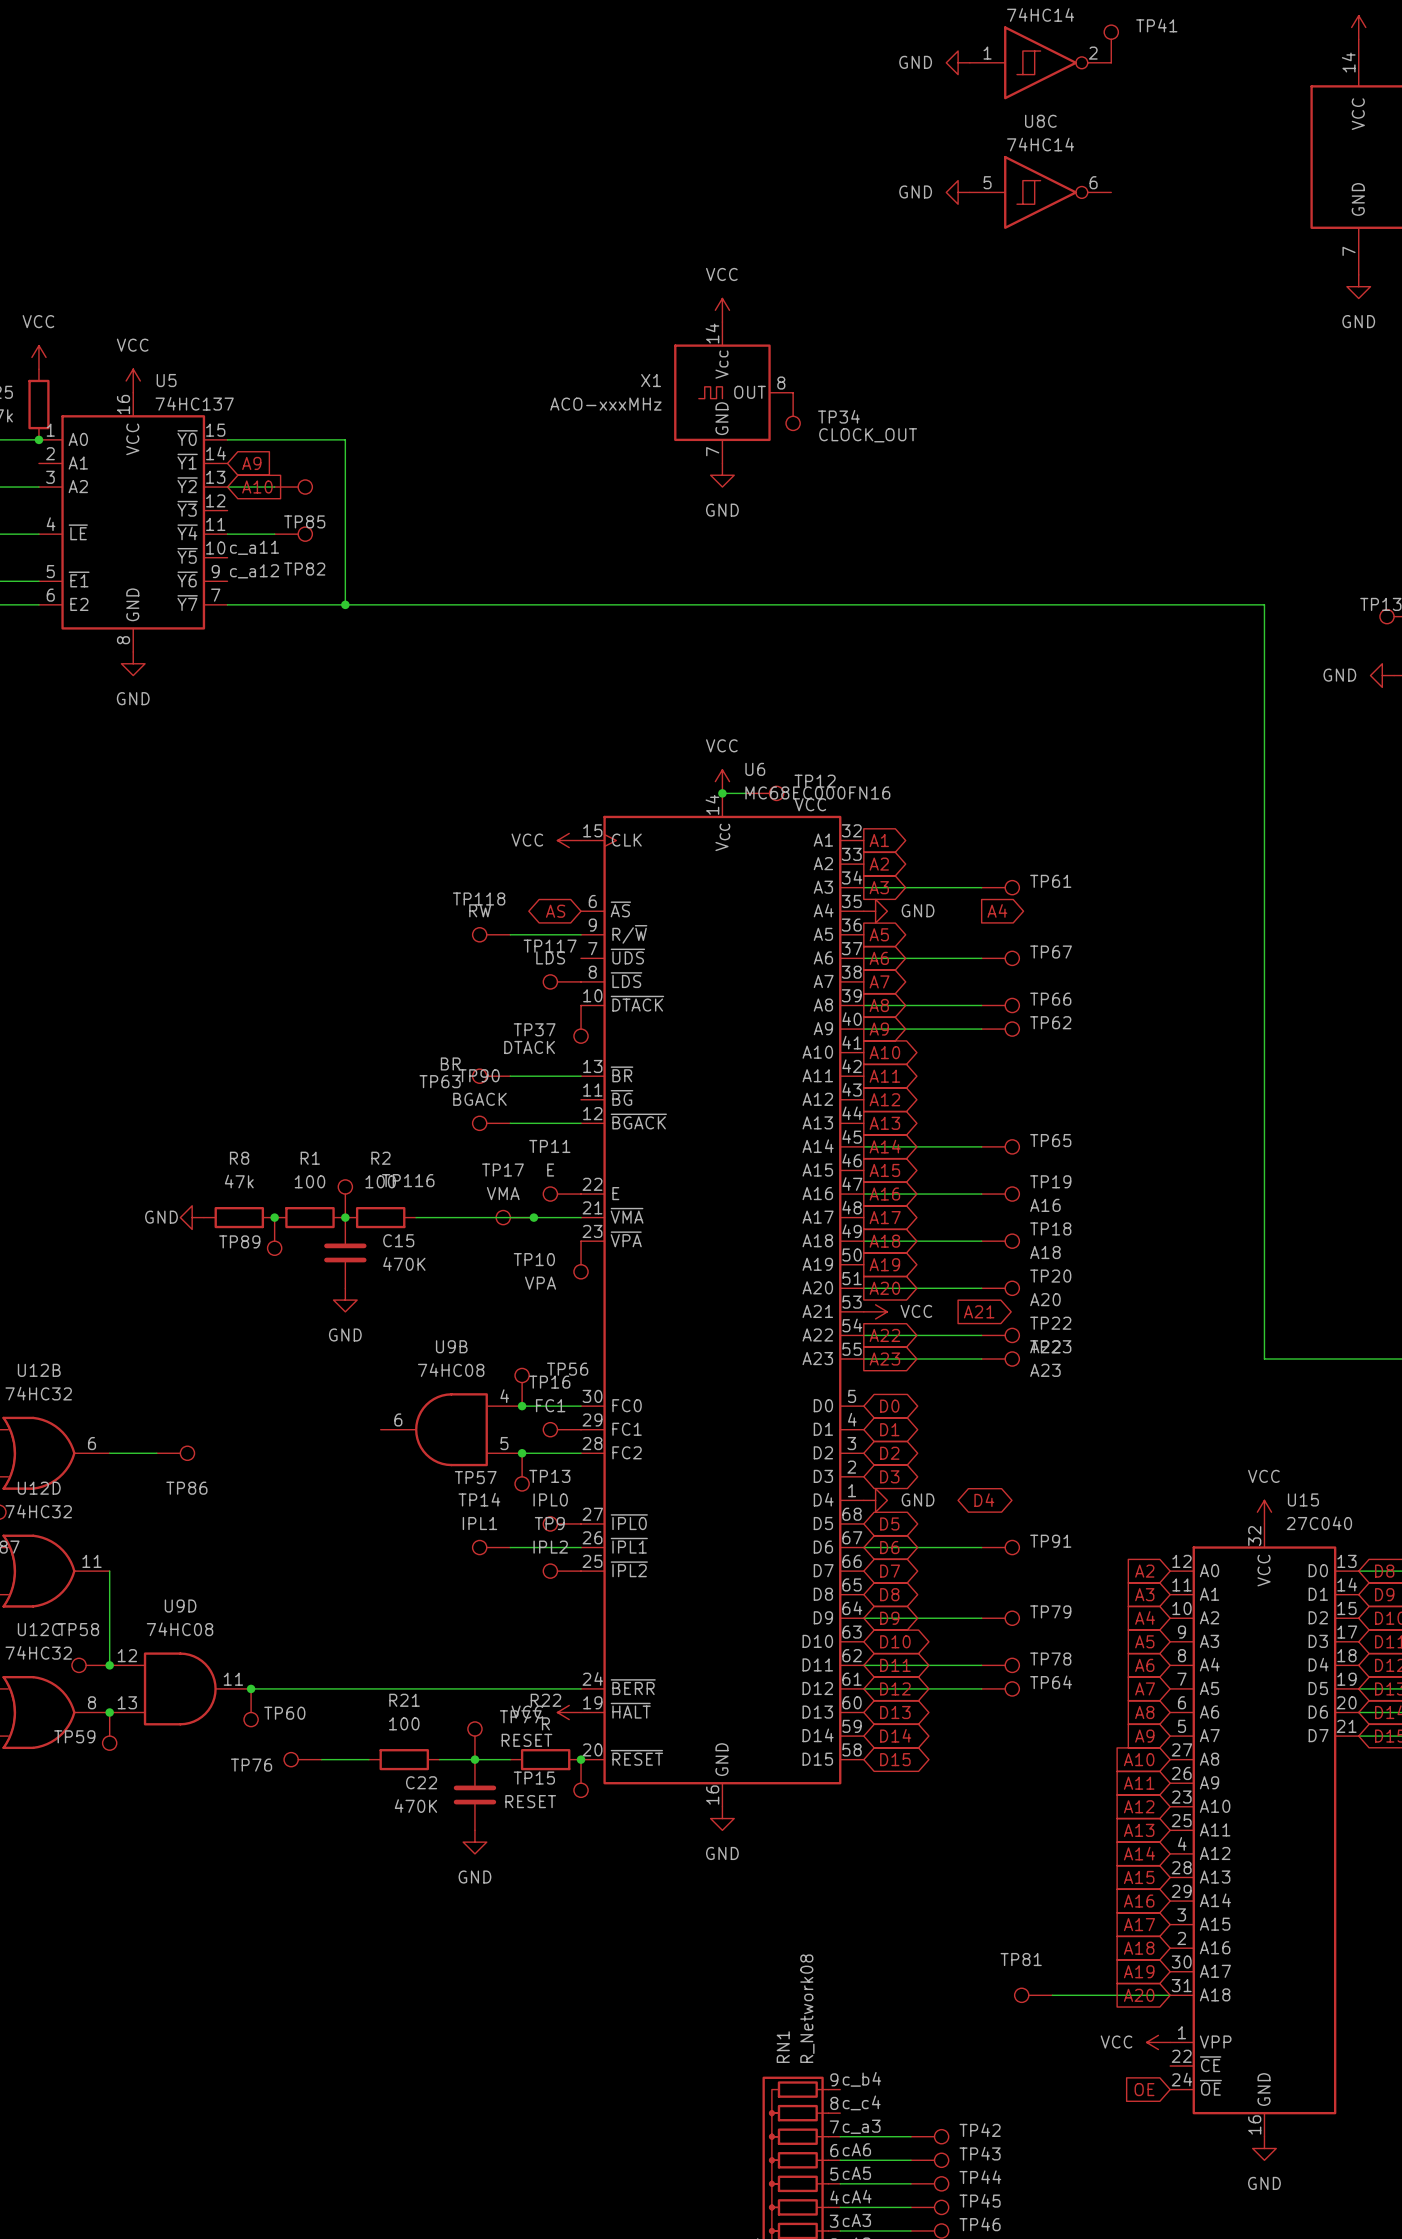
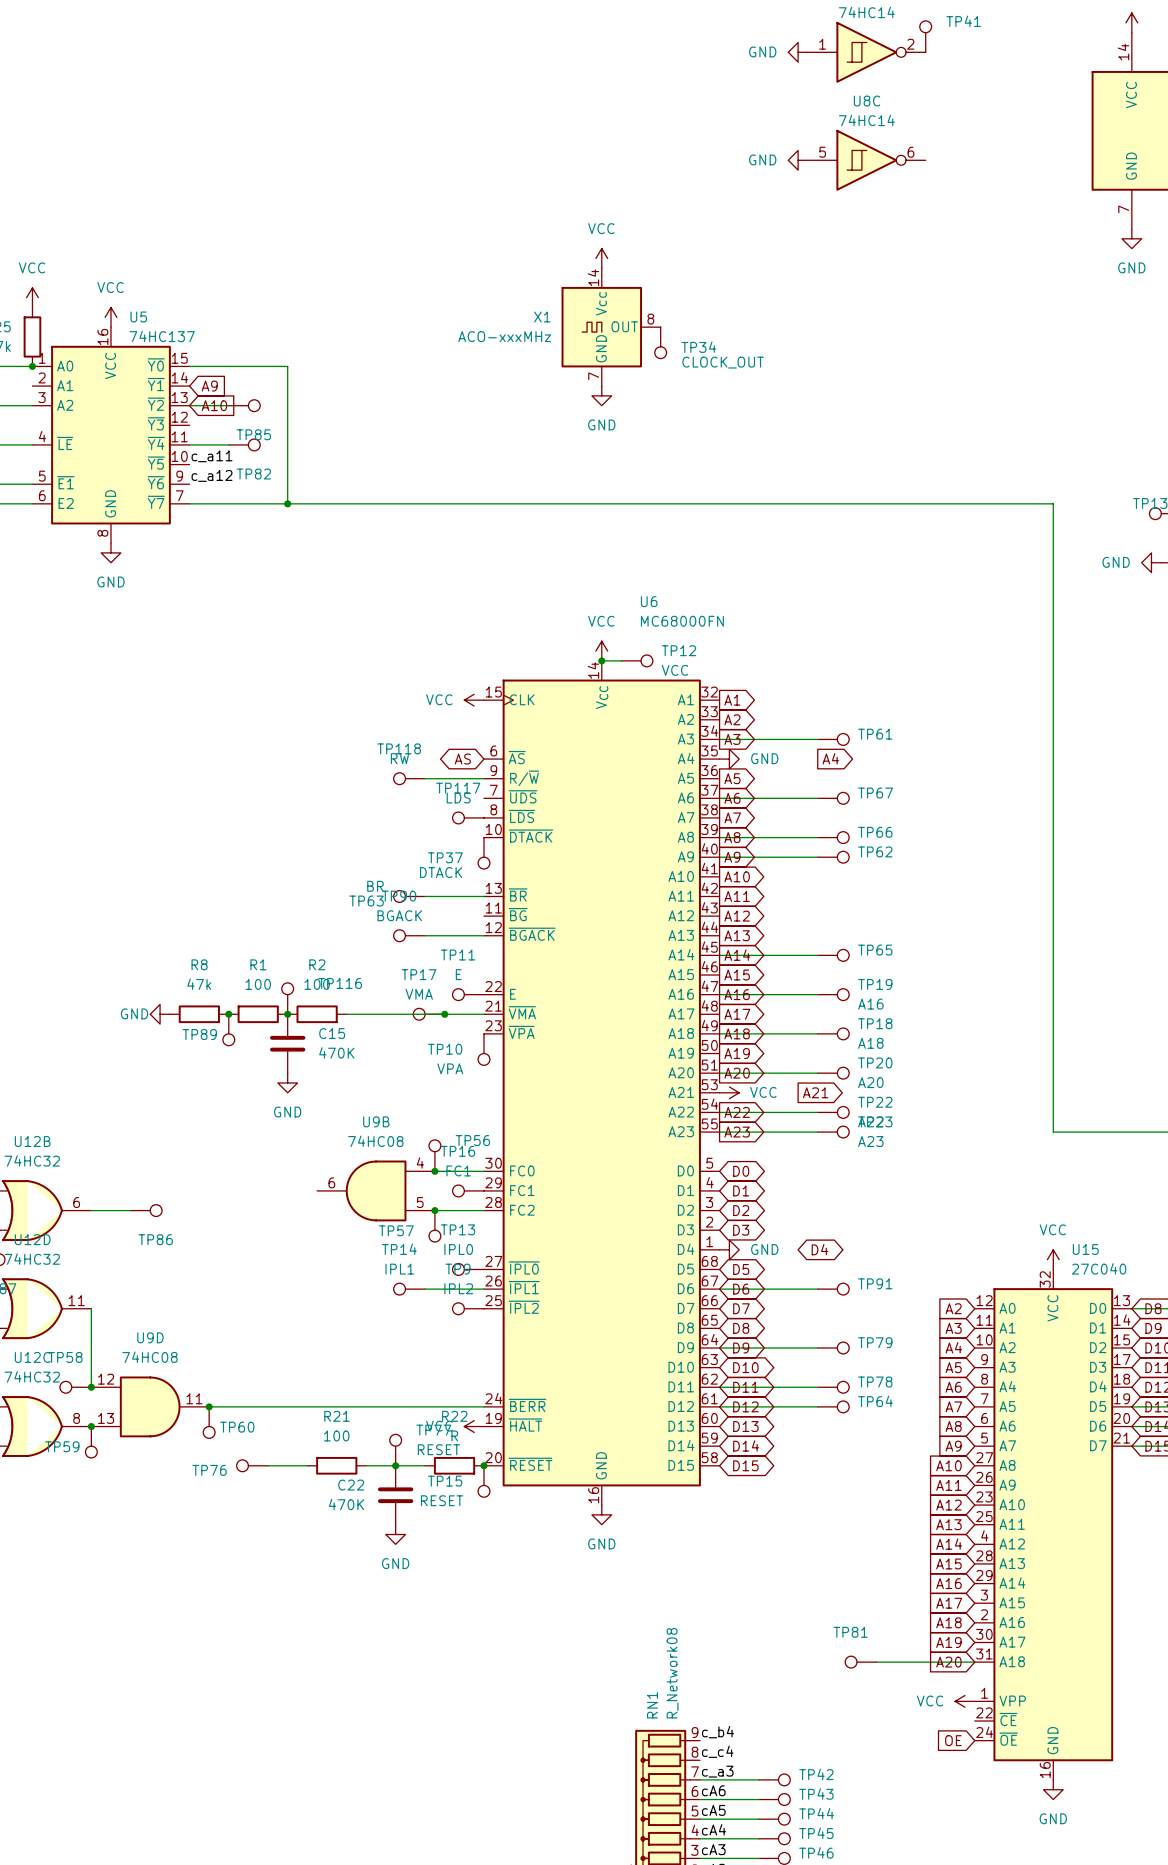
U6 name position: U6 (755, 769) -> U6 (649, 601)
U6 value: MC68EC000FN16 (817, 792) -> MC68000FN (682, 621)

